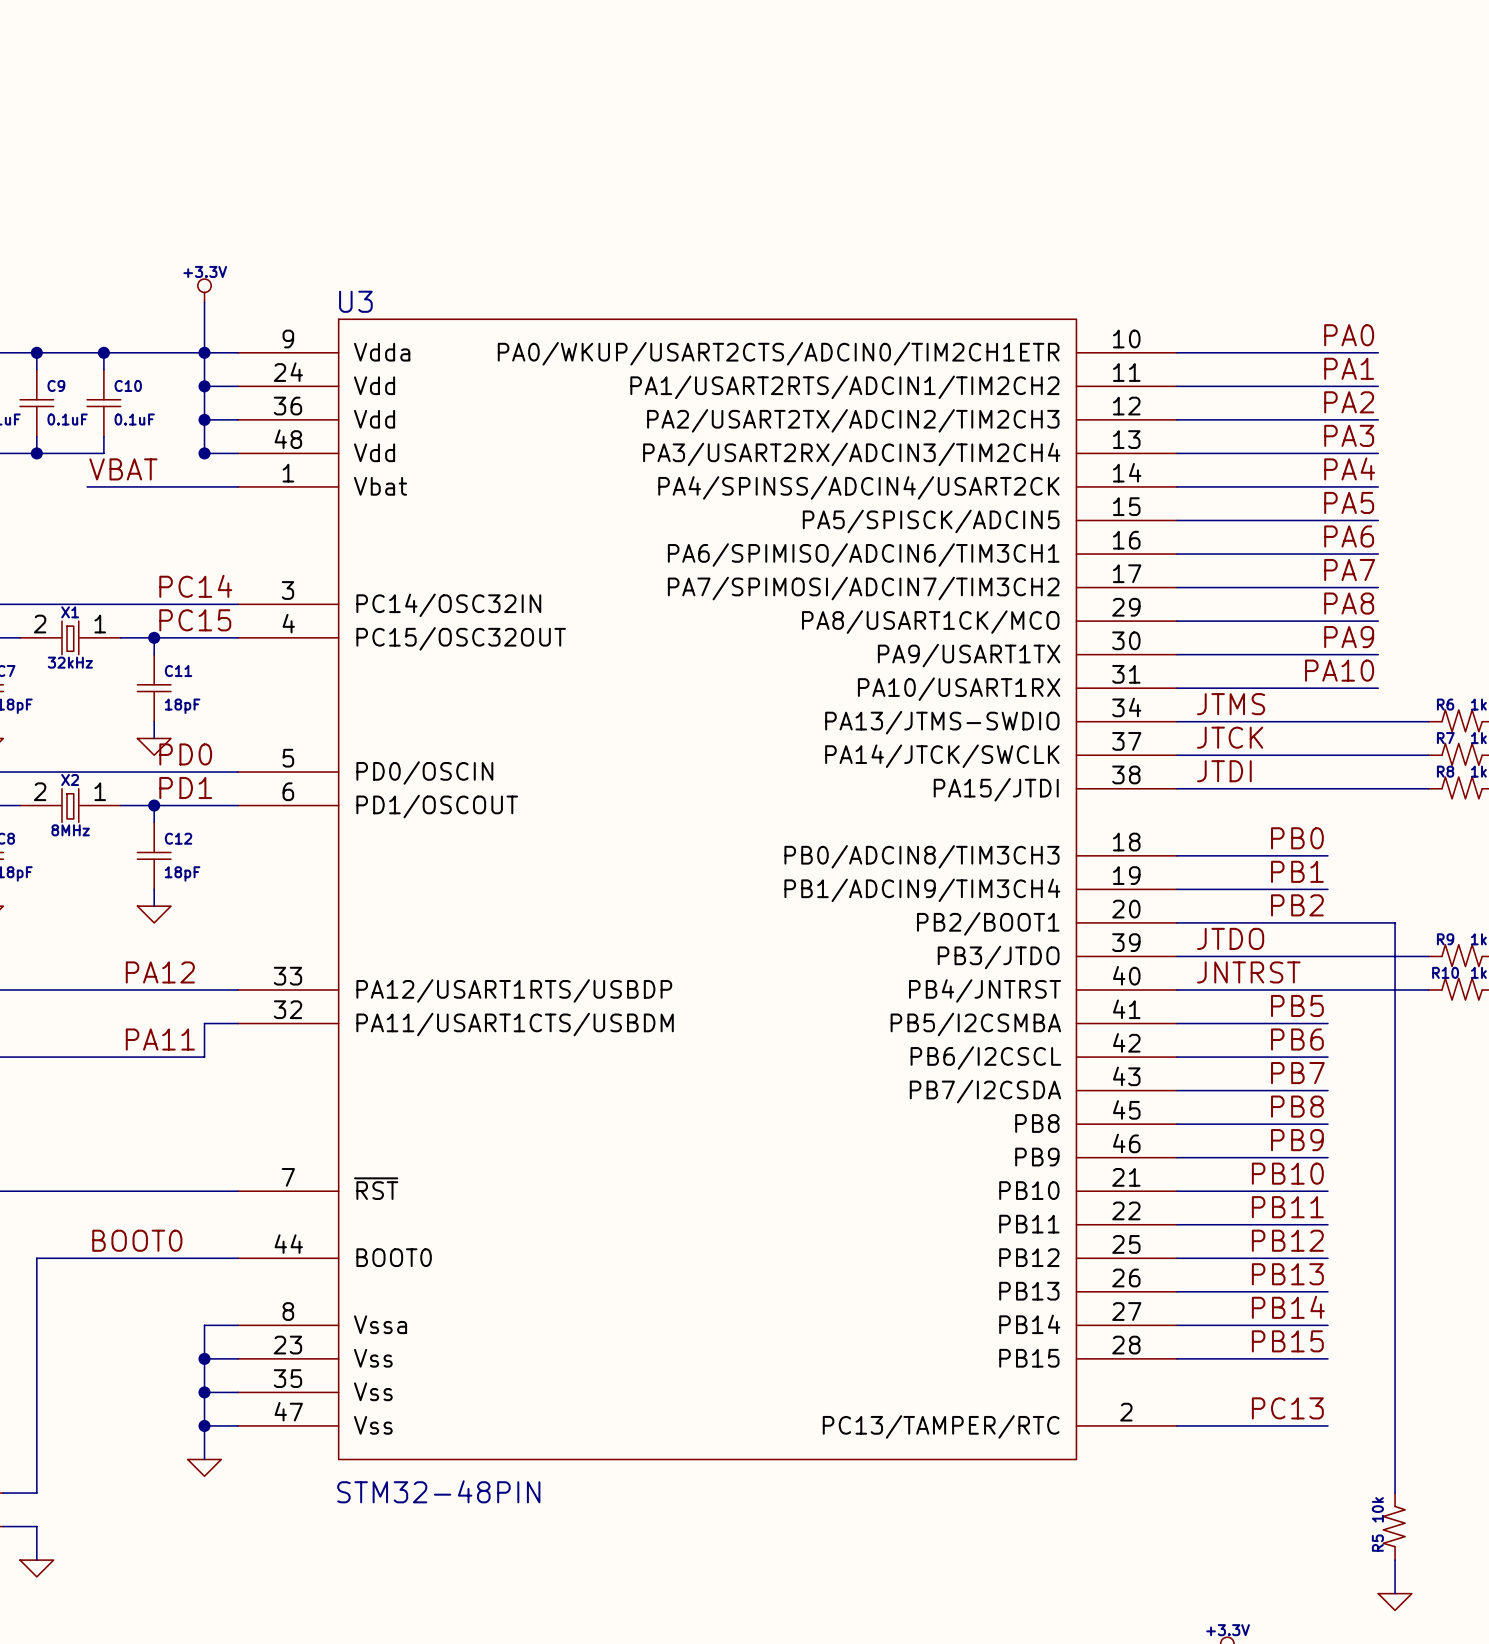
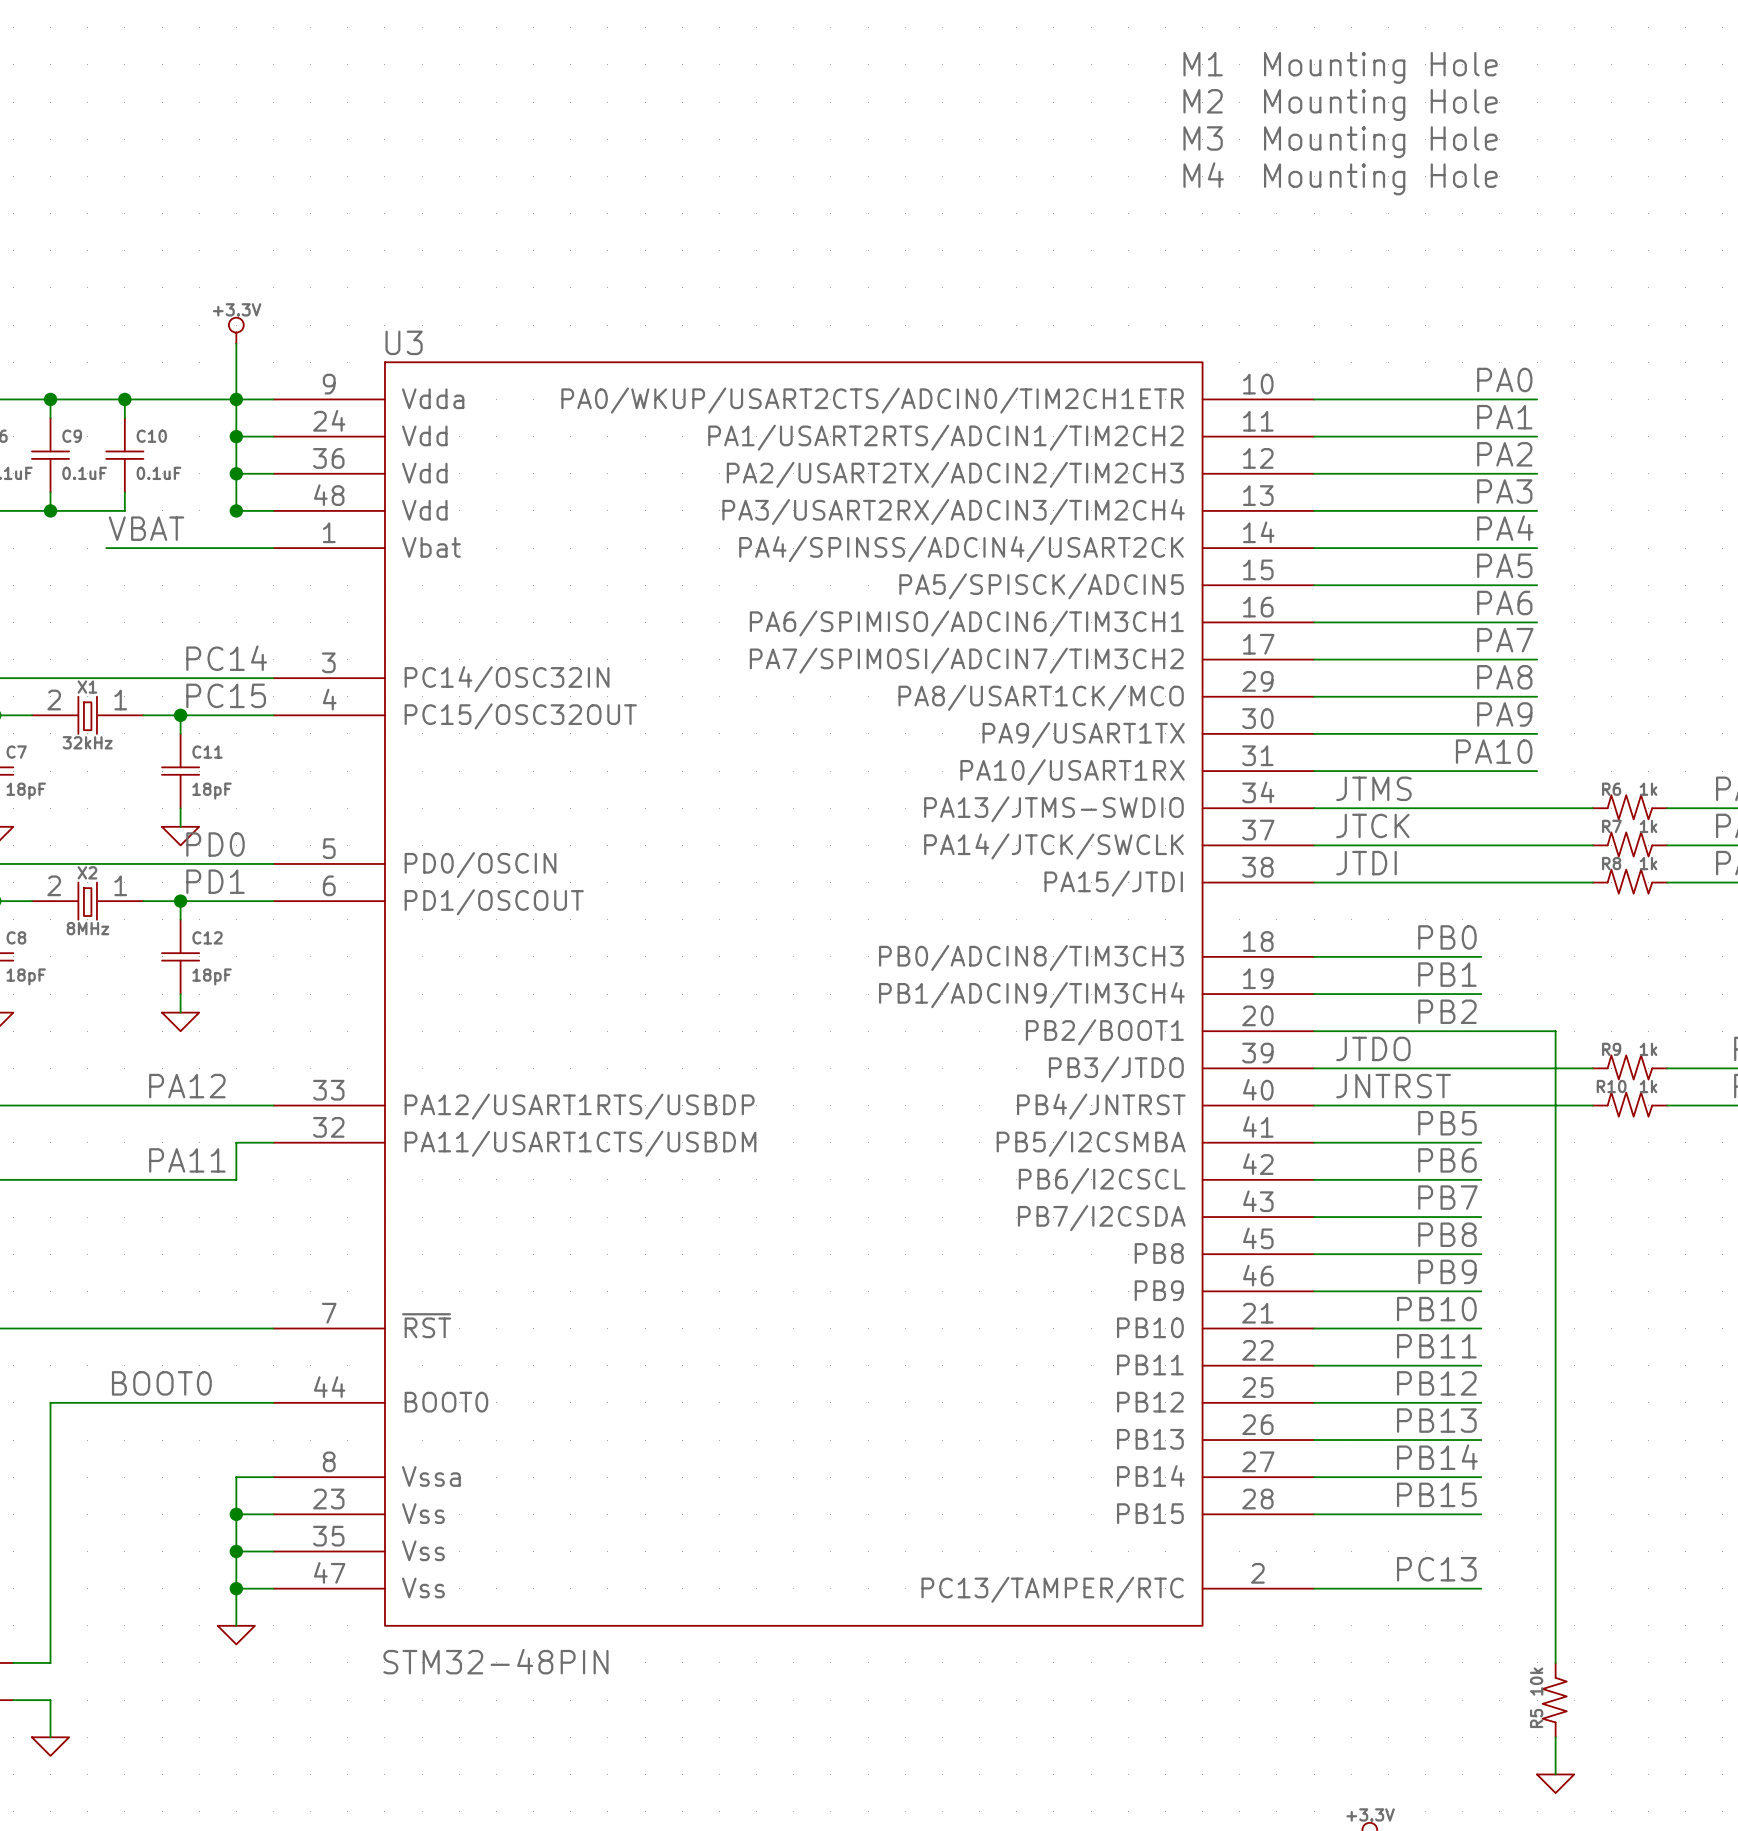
M1: none -> Mounting Hole (1340, 67)
M2: none -> Mounting Hole (1340, 105)
M3: none -> Mounting Hole (1340, 142)
M4: none -> Mounting Hole (1340, 178)

